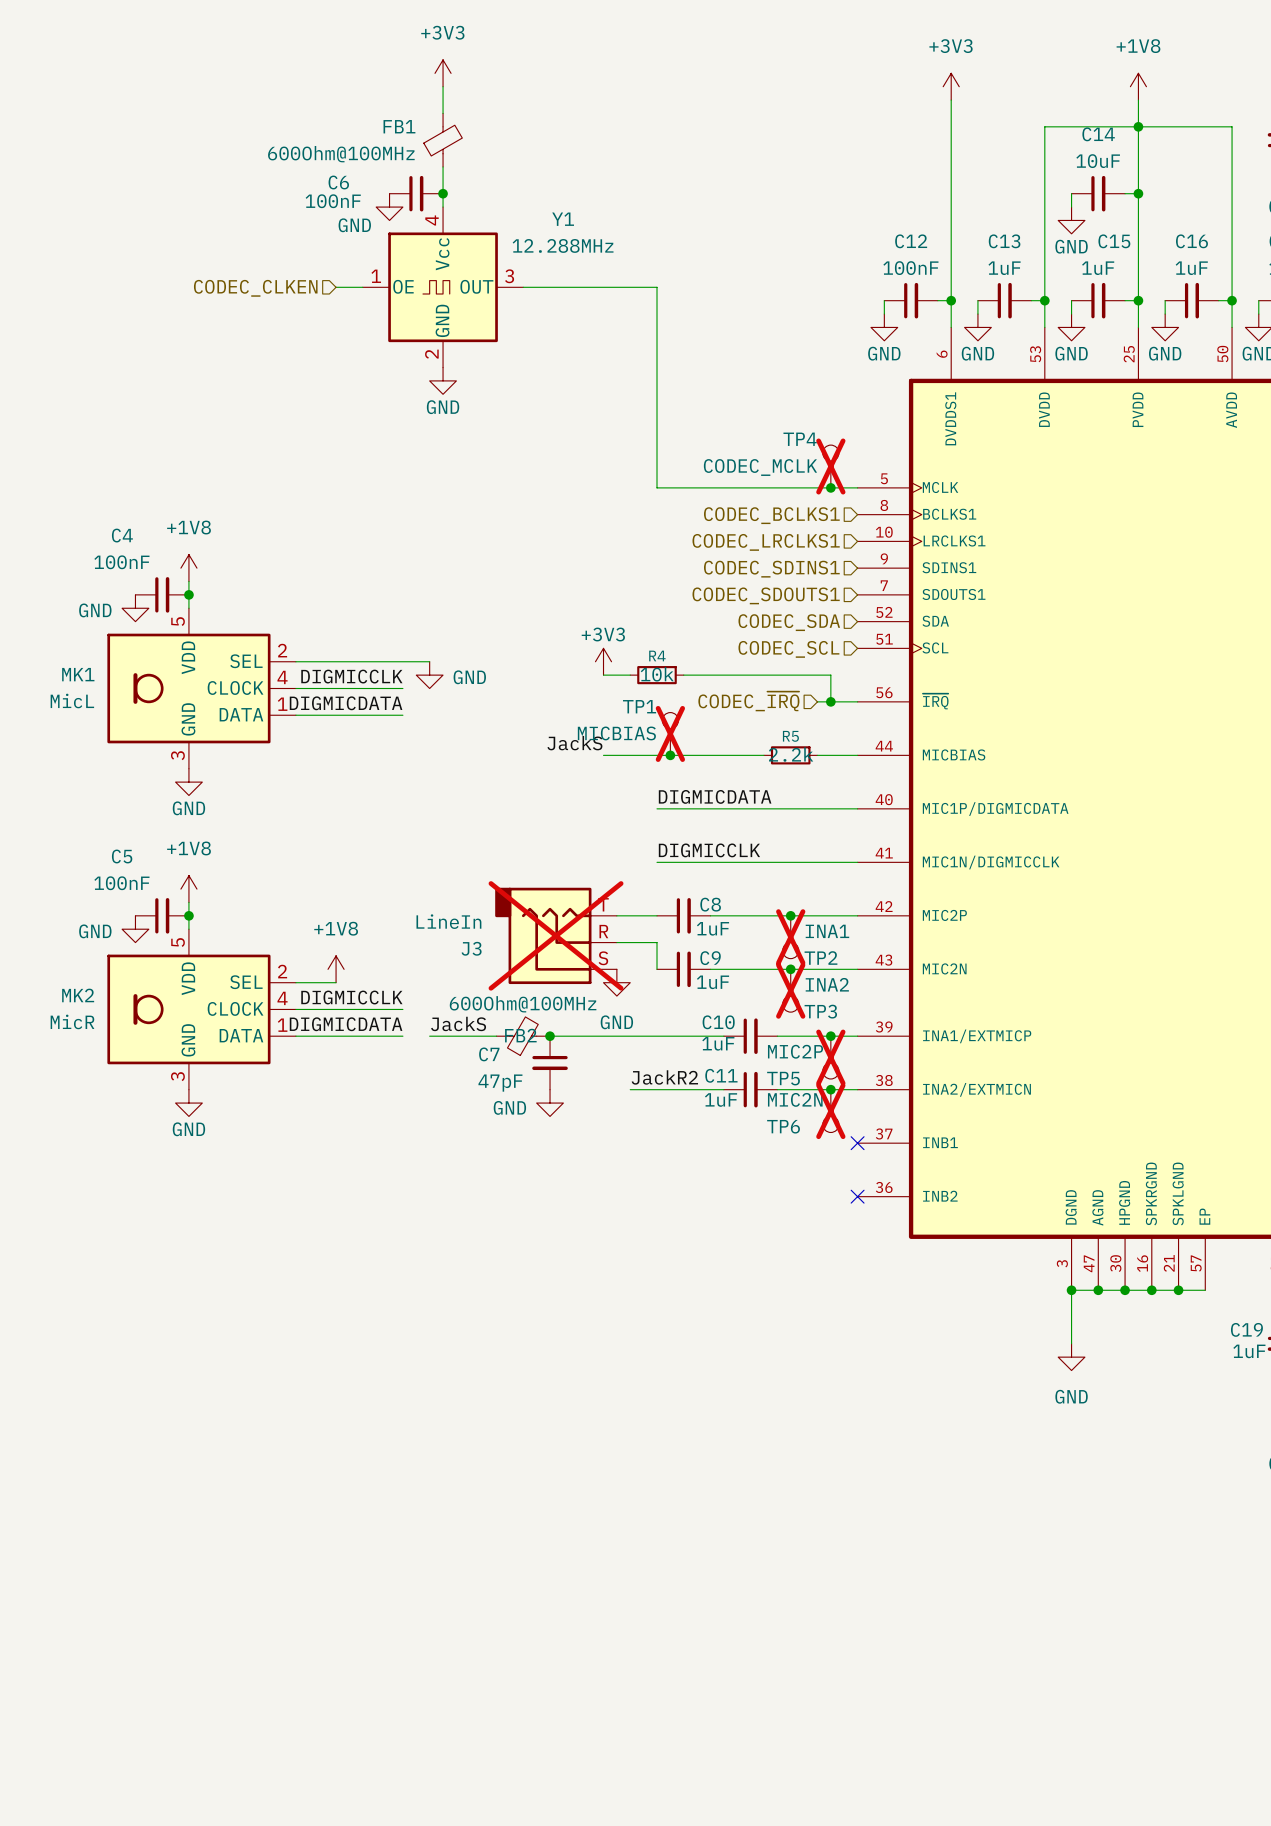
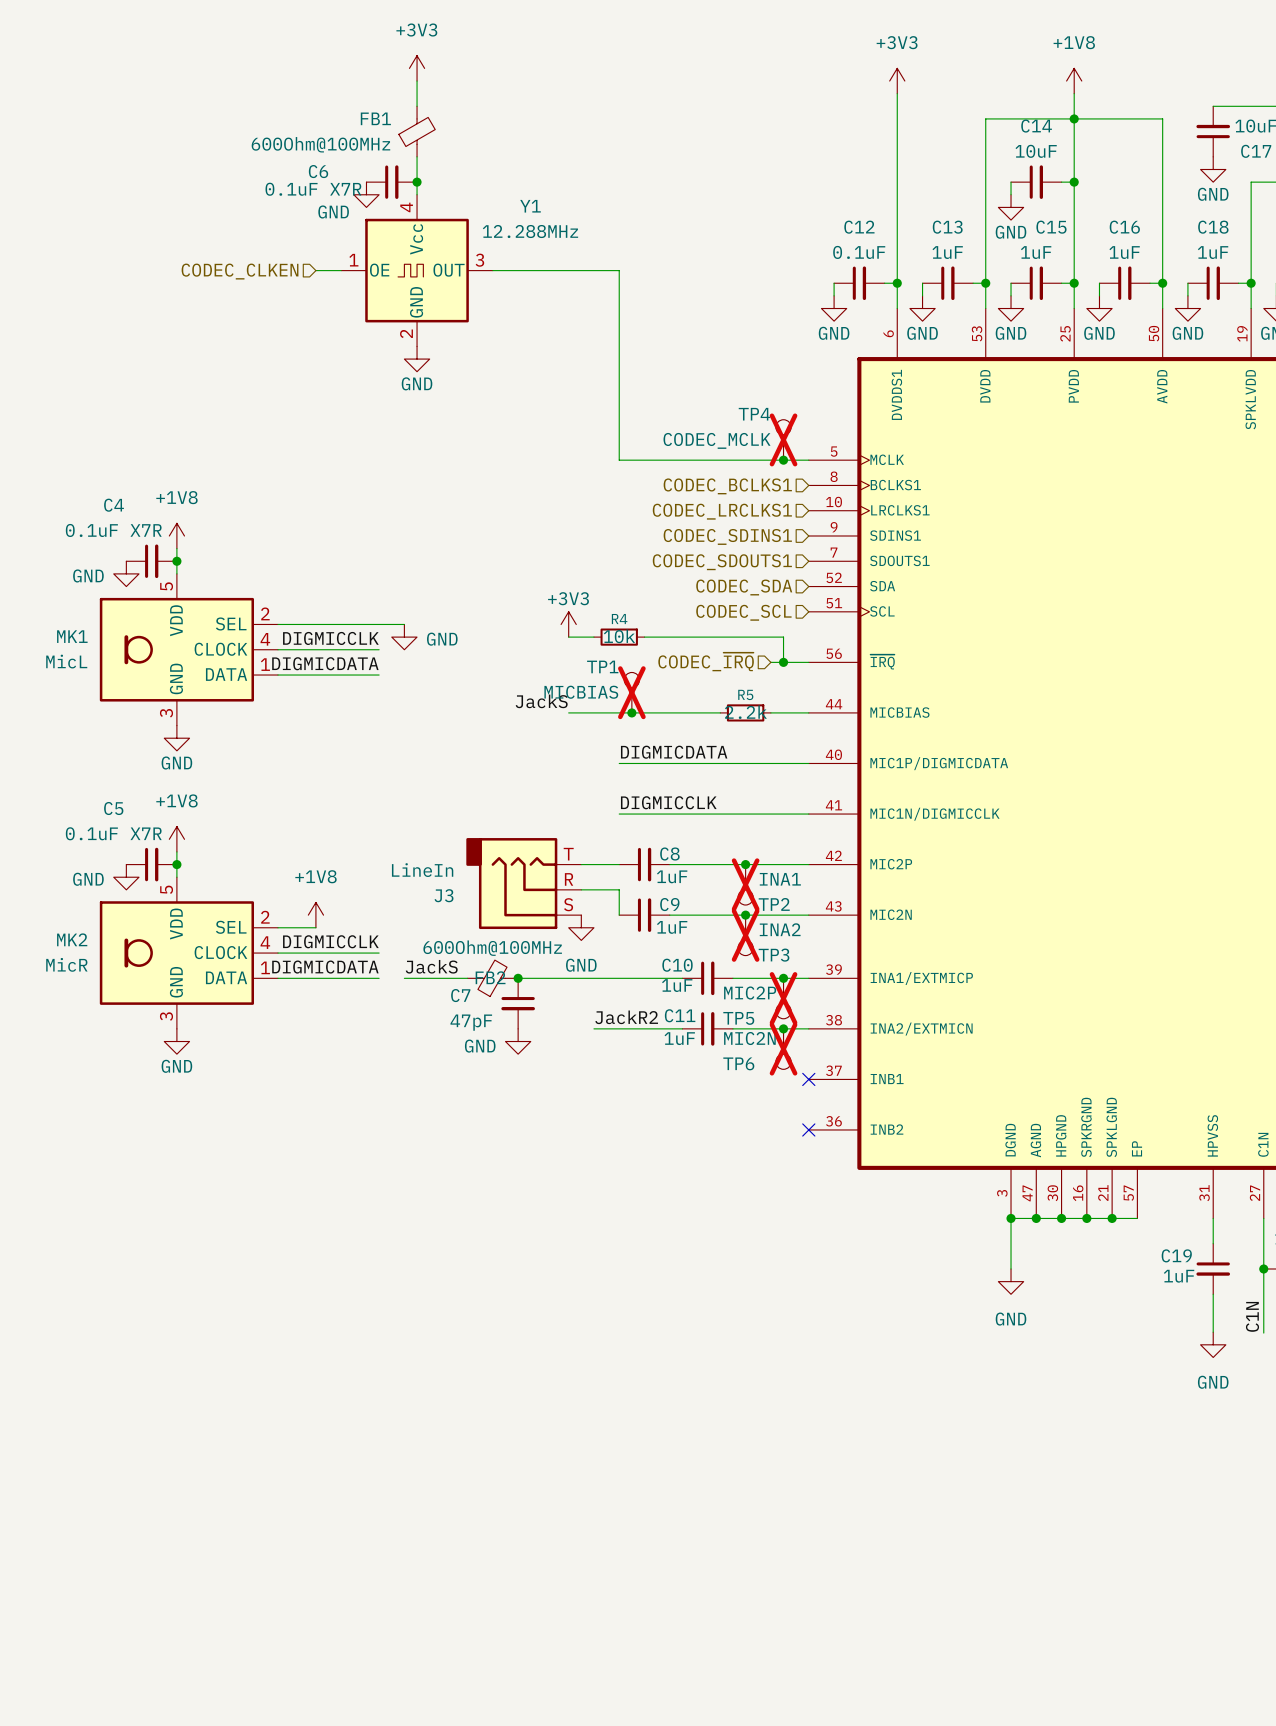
C6 value: 100nF (333, 201) -> 0.1uF X7R (313, 189)
C12 value: 100nF (910, 268) -> 0.1uF (859, 252)
C4 value: 100nF (121, 562) -> 0.1uF X7R (113, 530)
C5 value: 100nF (121, 883) -> 0.1uF X7R (113, 833)
J3 do-not-place cross: (556, 935) -> none

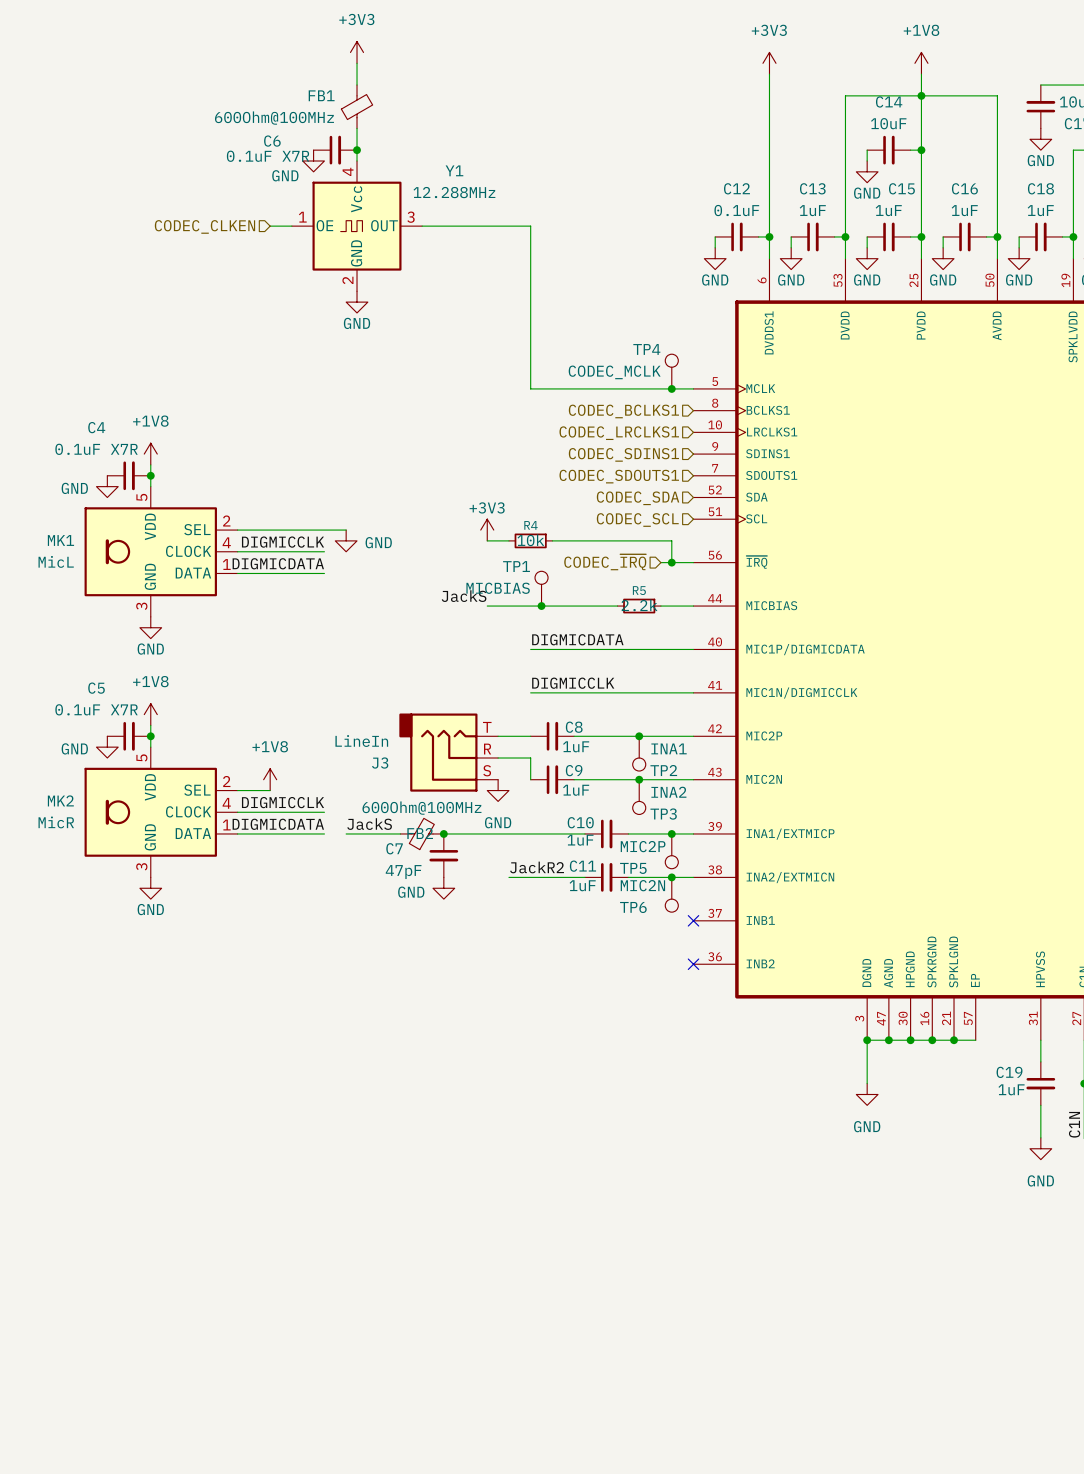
TP4 do-not-place cross: (783, 439) -> none
TP1 do-not-place cross: (631, 692) -> none
TP2 do-not-place cross: (745, 884) -> none
TP3 do-not-place cross: (745, 935) -> none
TP5 do-not-place cross: (783, 998) -> none
TP6 do-not-place cross: (783, 1049) -> none

